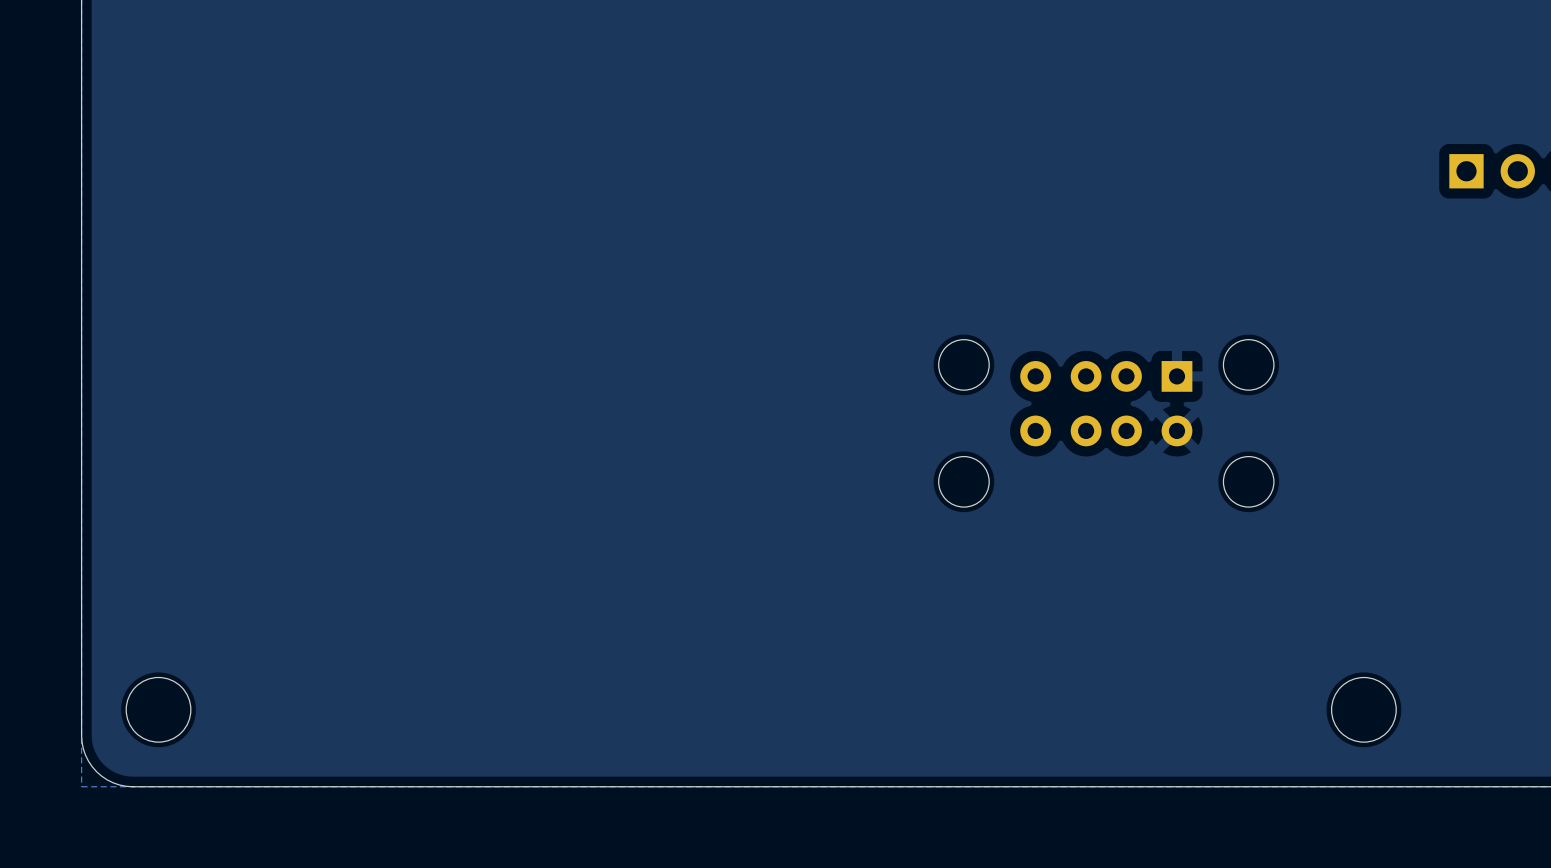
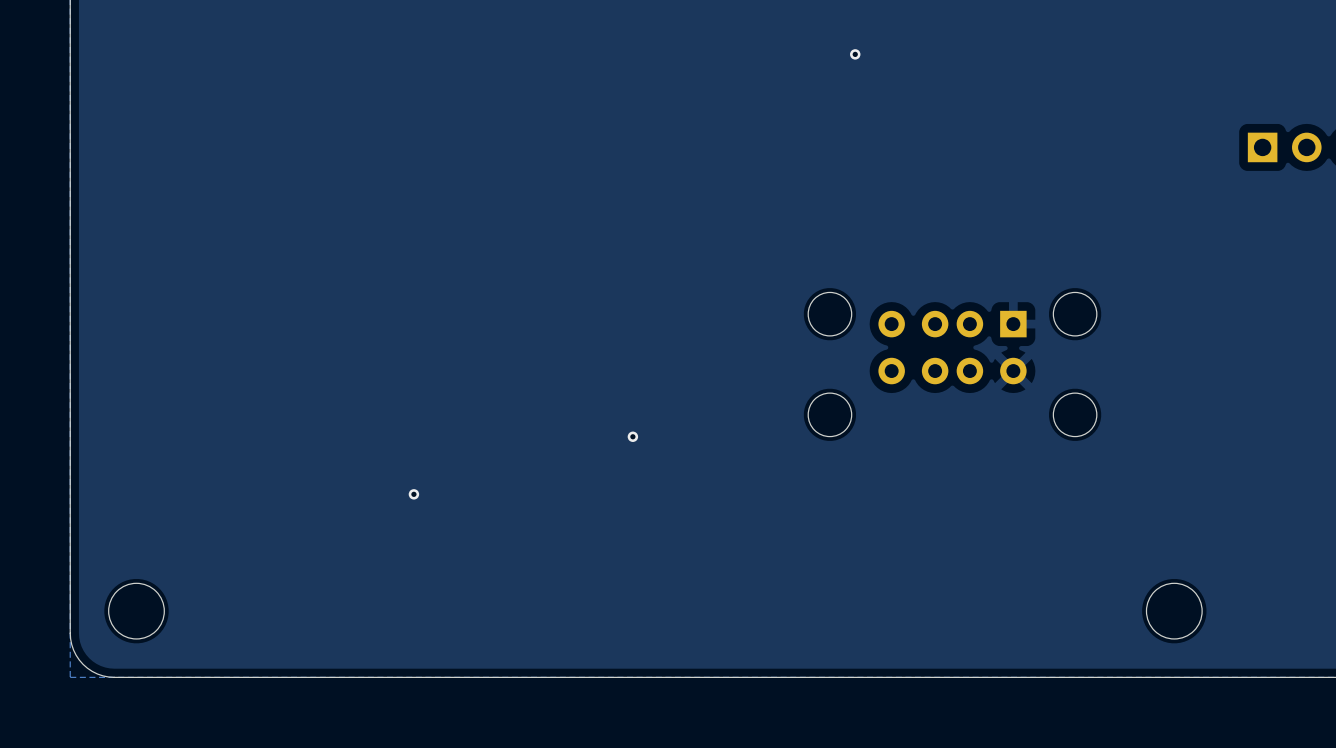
via: none -> (855, 54)
via: none -> (632, 436)
via: none -> (413, 494)

